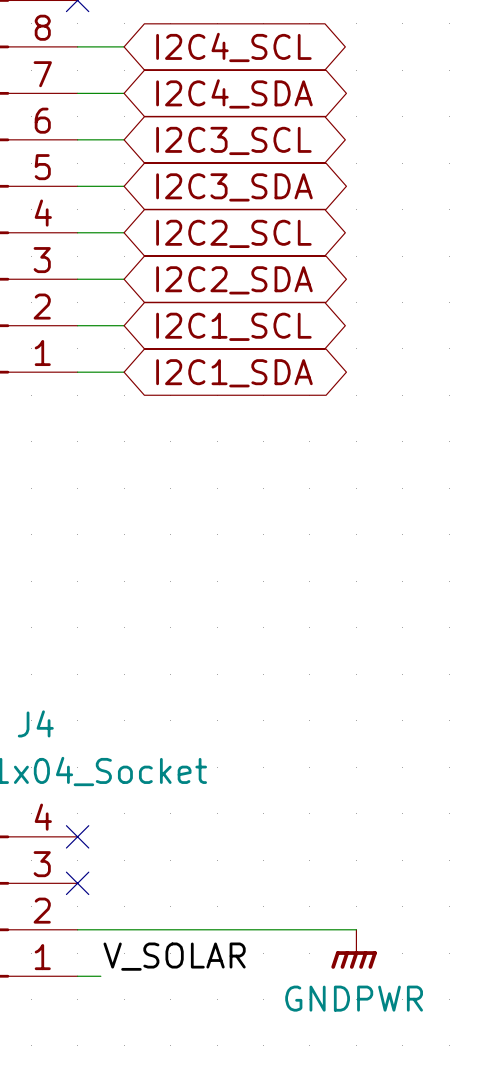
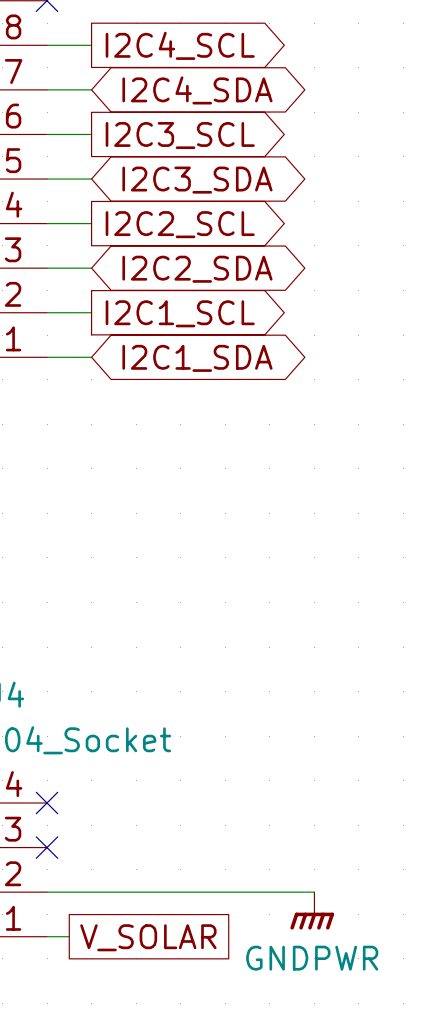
global label shape: bidirectional (233, 47) -> output (180, 45)
global label shape: bidirectional (233, 140) -> output (180, 135)
global label shape: bidirectional (233, 233) -> output (180, 224)
global label shape: bidirectional (233, 326) -> output (180, 313)
label: V_SOLAR (174, 956) -> none
global label: none -> V_SOLAR (148, 937)

